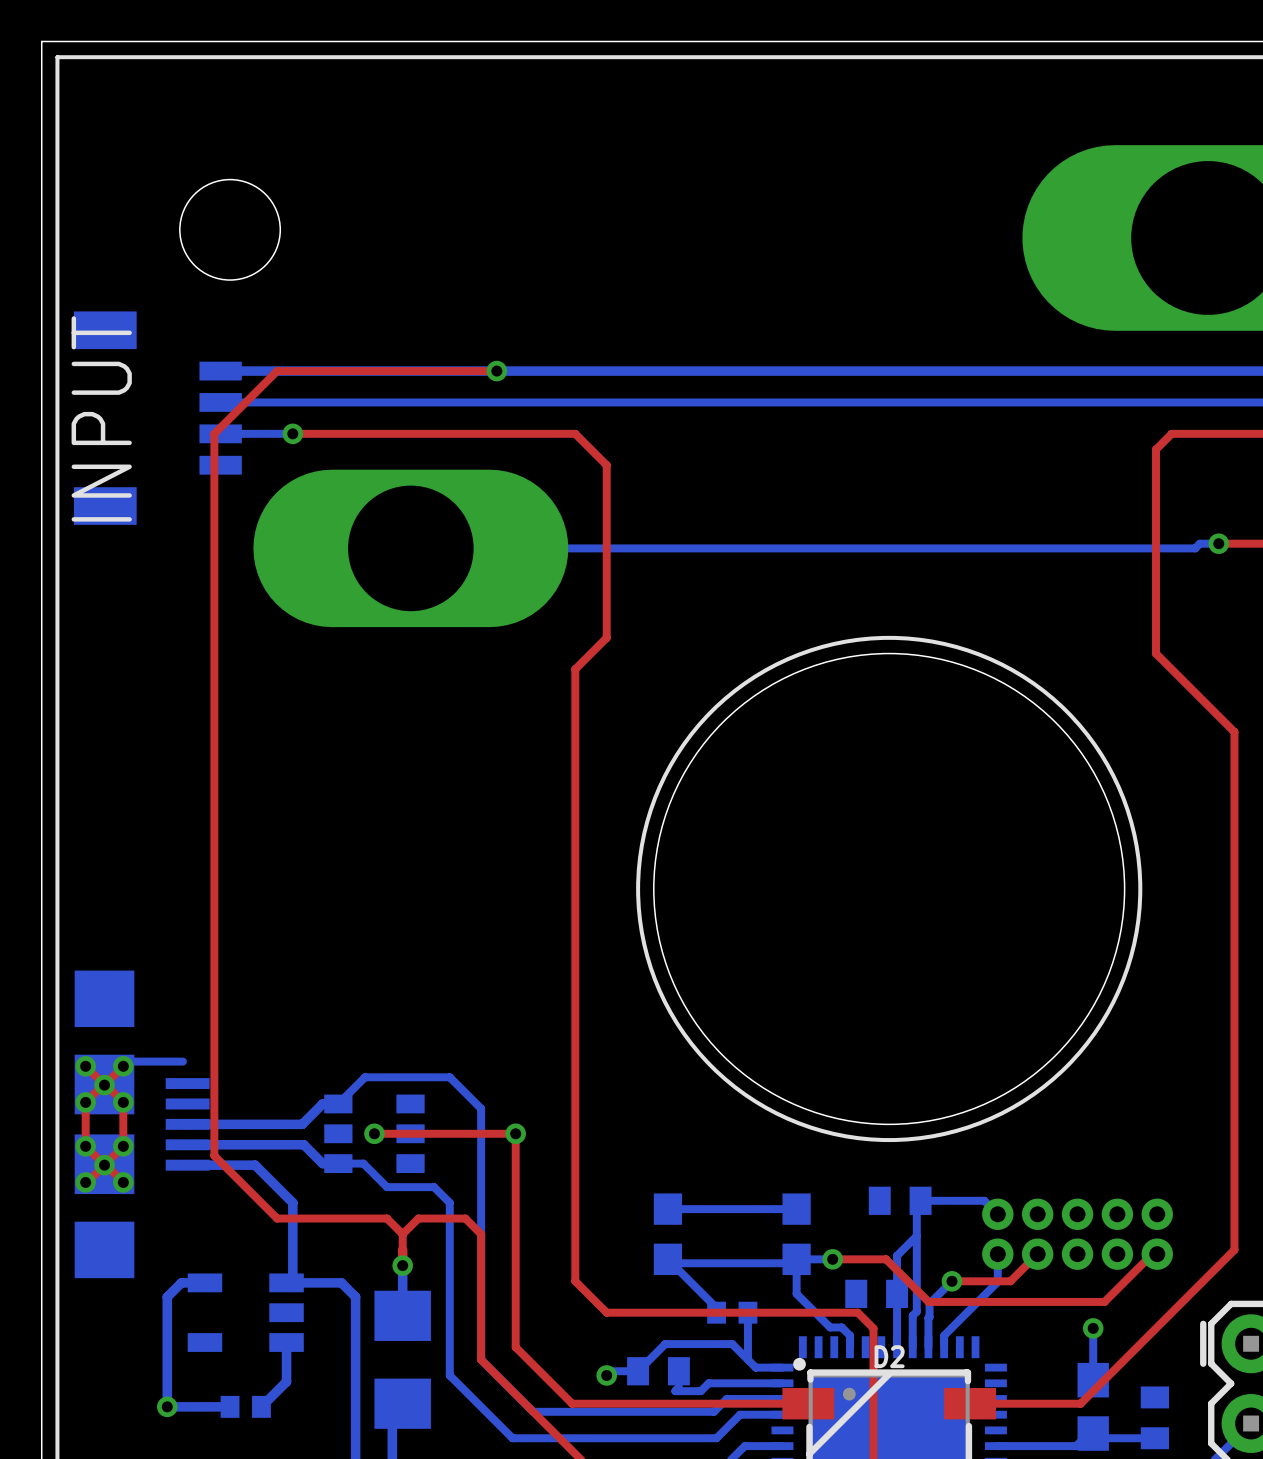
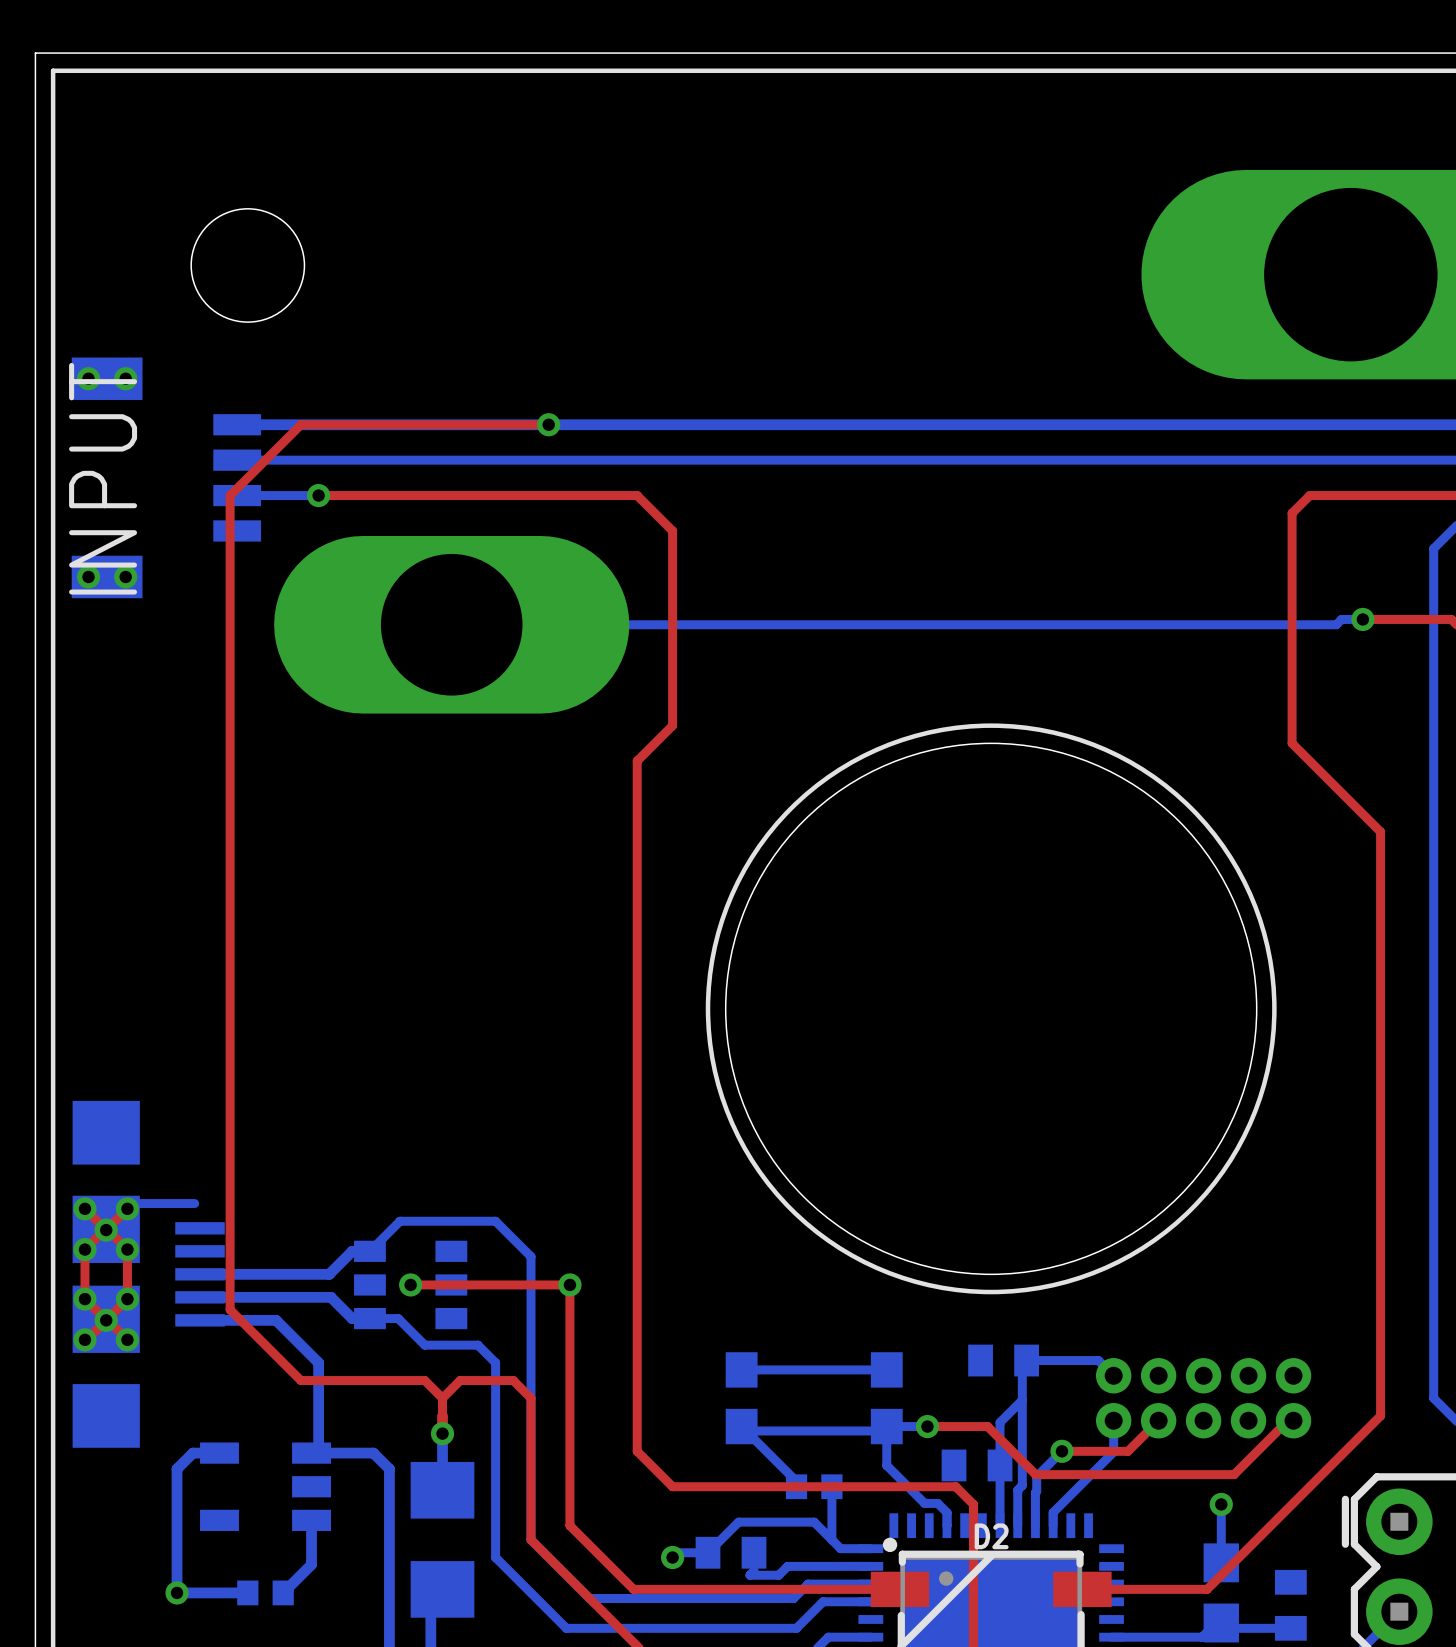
via: none -> (88, 378)
via: none -> (125, 378)
via: none -> (88, 576)
via: none -> (125, 576)

